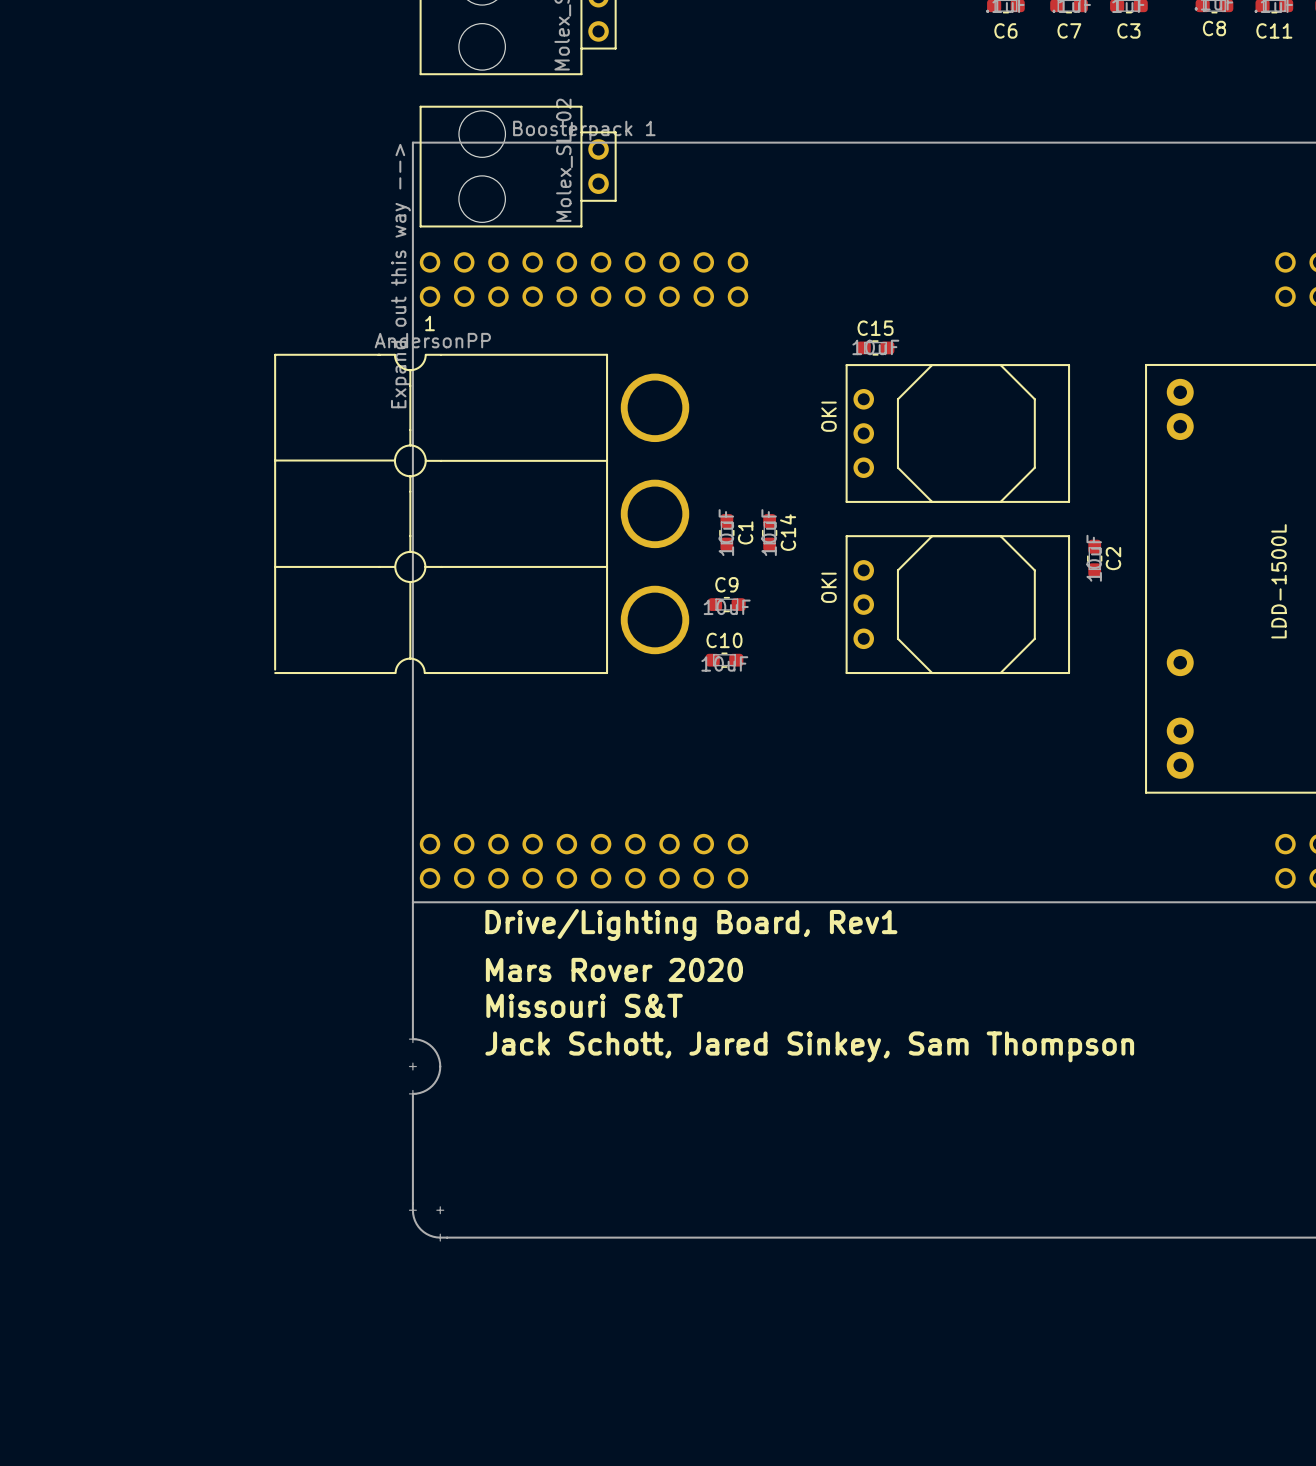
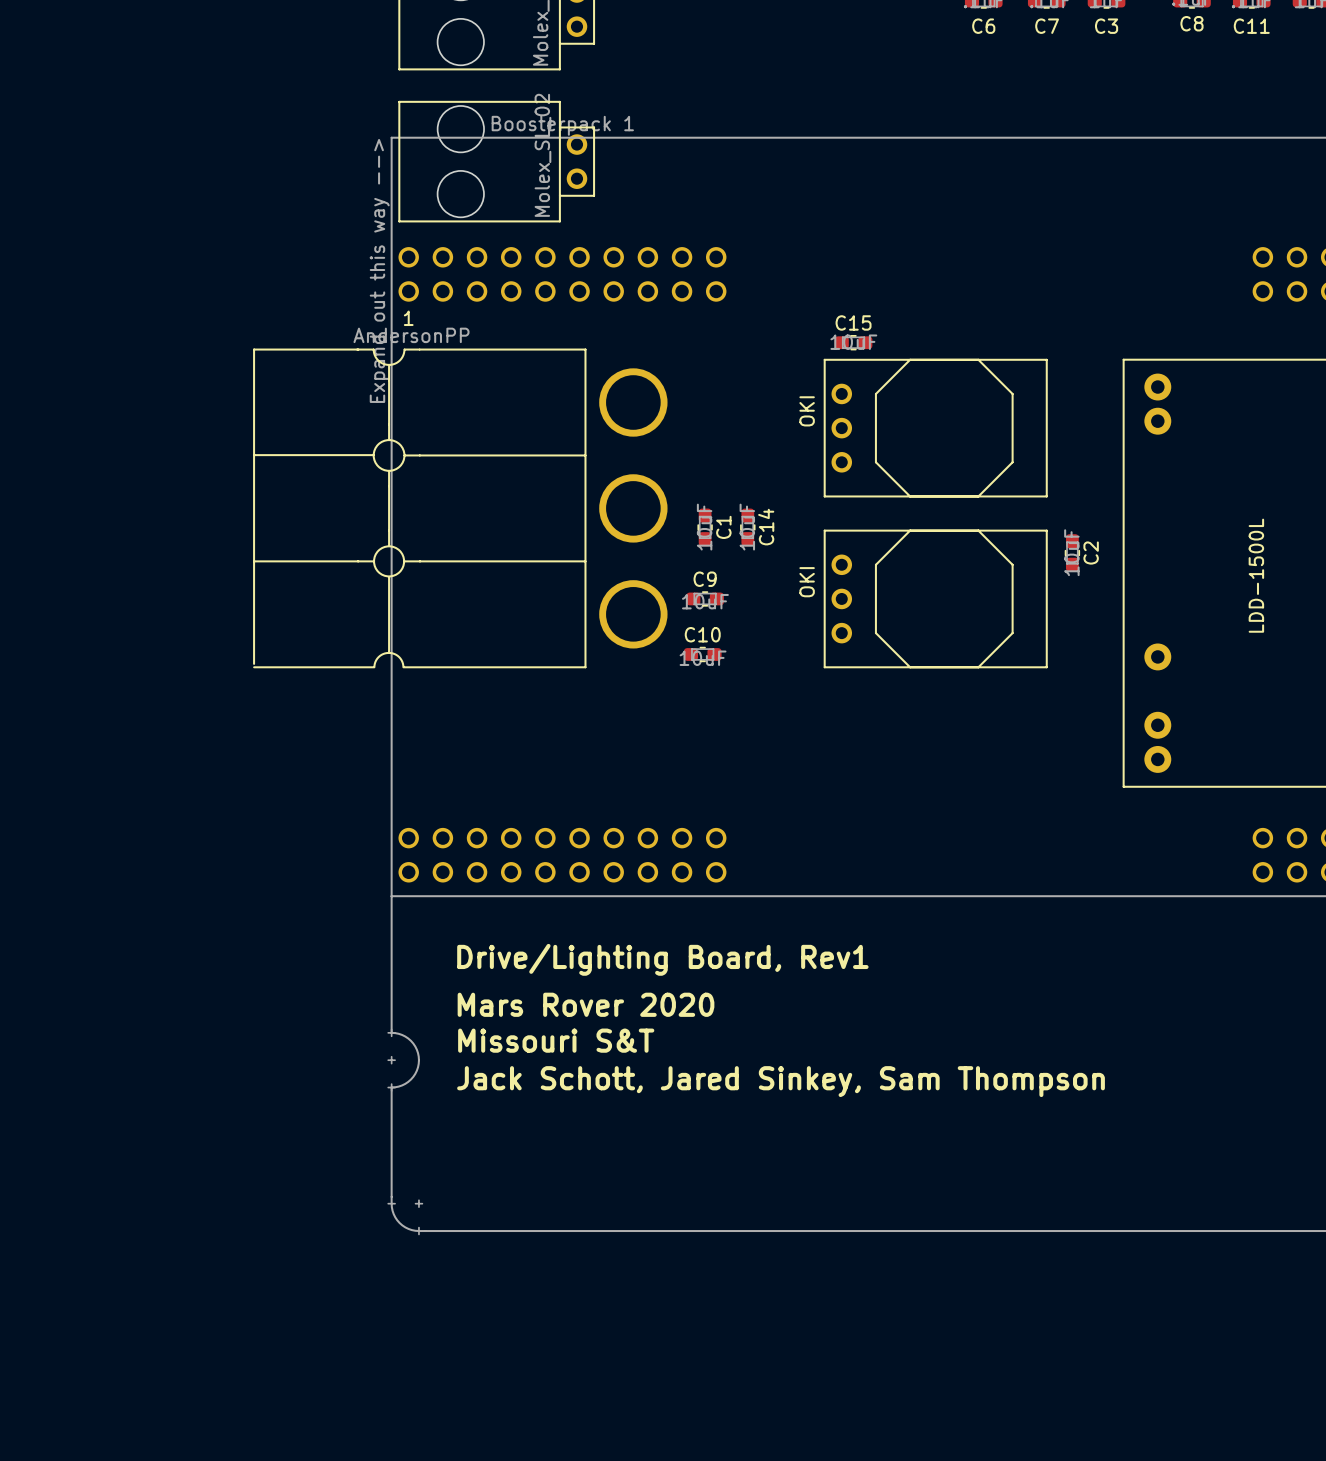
text position: Drive/Lighting Board, Rev1 (691, 924) -> Drive/Lighting Board, Rev1 (662, 959)
text position: Mars Rover 2020 (614, 969) -> Mars Rover 2020 (586, 1004)
text position: Missouri S&T (584, 1005) -> Missouri S&T (556, 1040)
text position: Jack Schott, Jared Sinkey, Sam Thompson (809, 1046) -> Jack Schott, Jared Sinkey, Sam Thompson (781, 1081)

